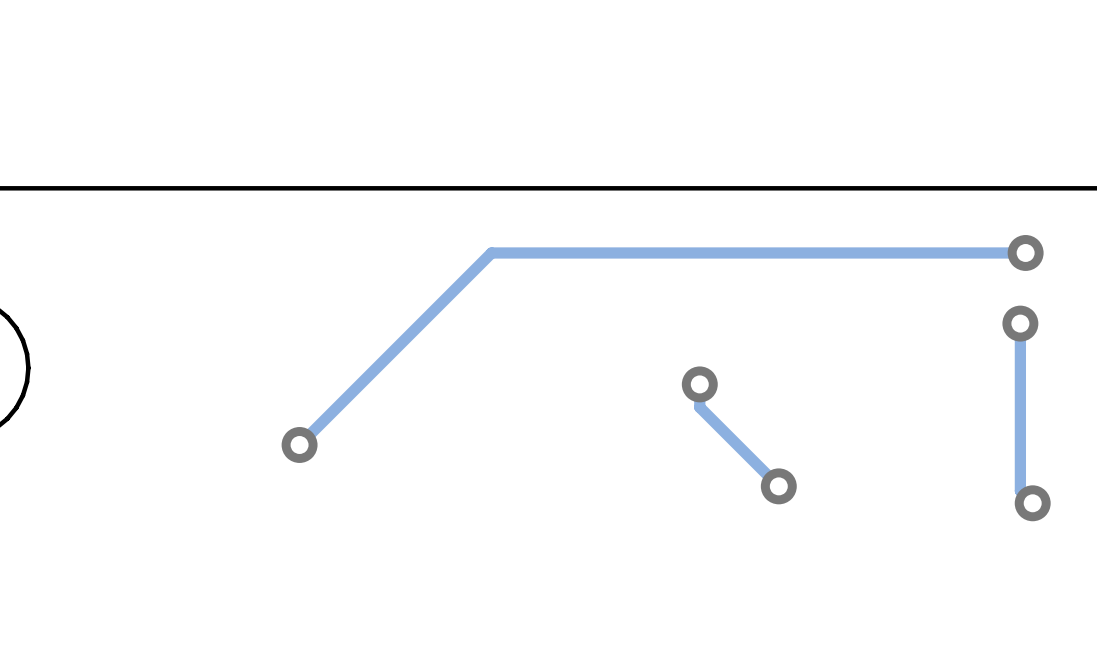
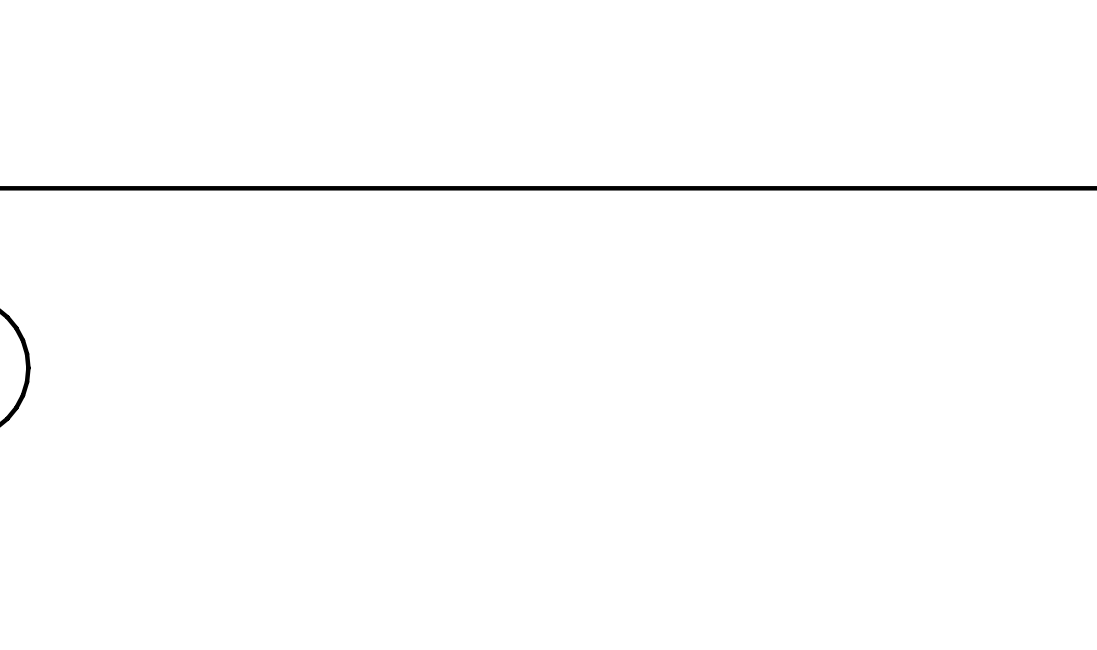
track: (1025, 252) (491, 252) (299, 444) -> none
via: (1025, 252) -> none
track: (1020, 323) (1020, 490) (1032, 503) -> none
via: (1020, 323) -> none
track: (699, 384) (699, 407) (778, 486) -> none
via: (699, 384) -> none
via: (299, 444) -> none
via: (778, 486) -> none
via: (1032, 503) -> none

